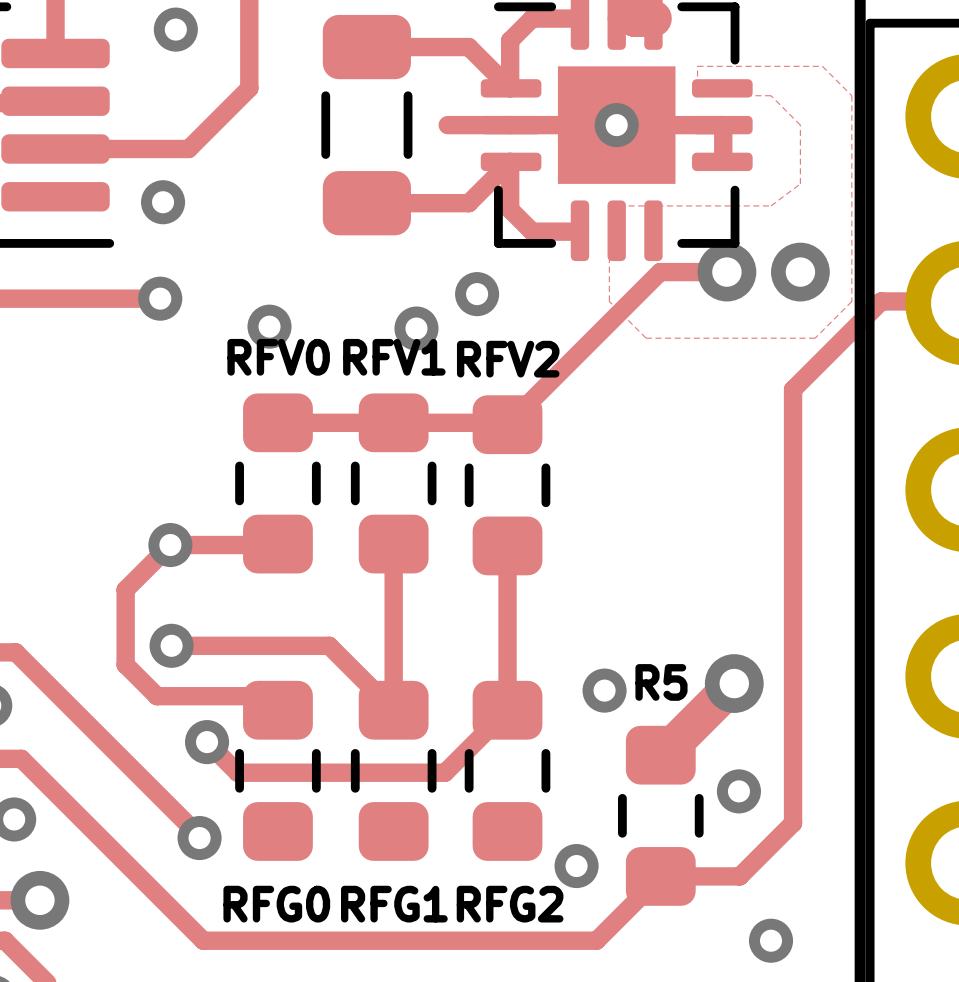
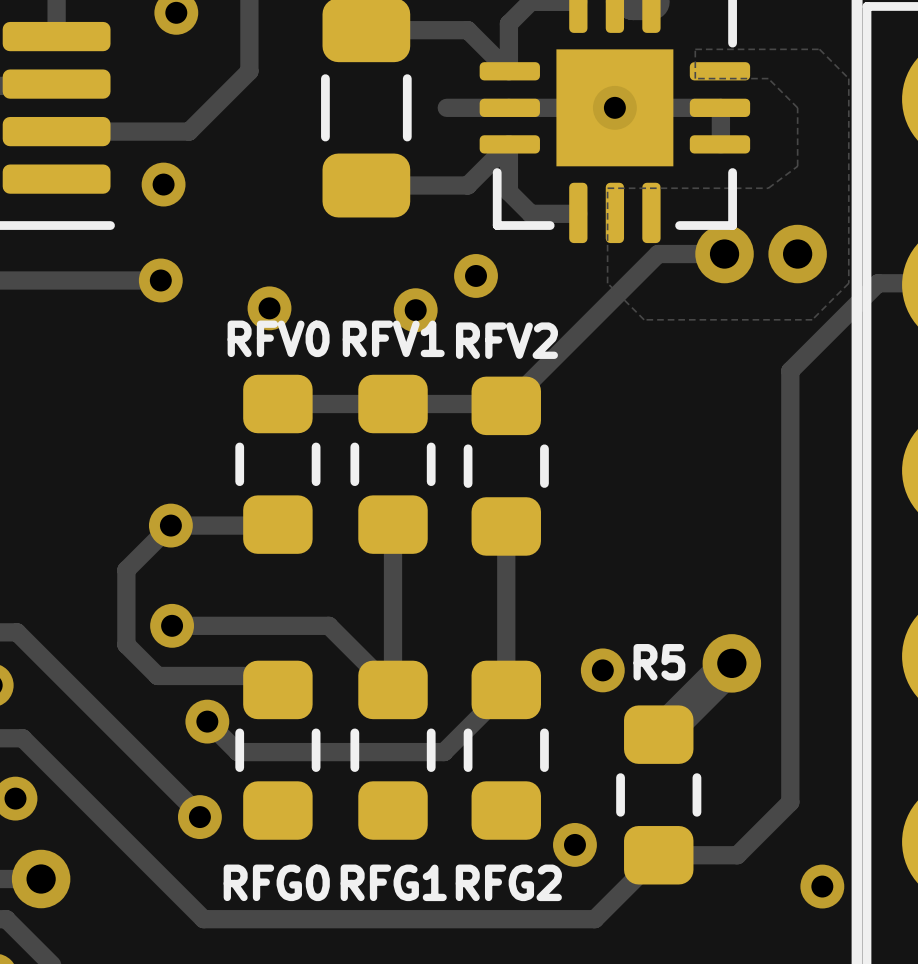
via: (738, 791) -> none
via position: (771, 940) -> (822, 886)

